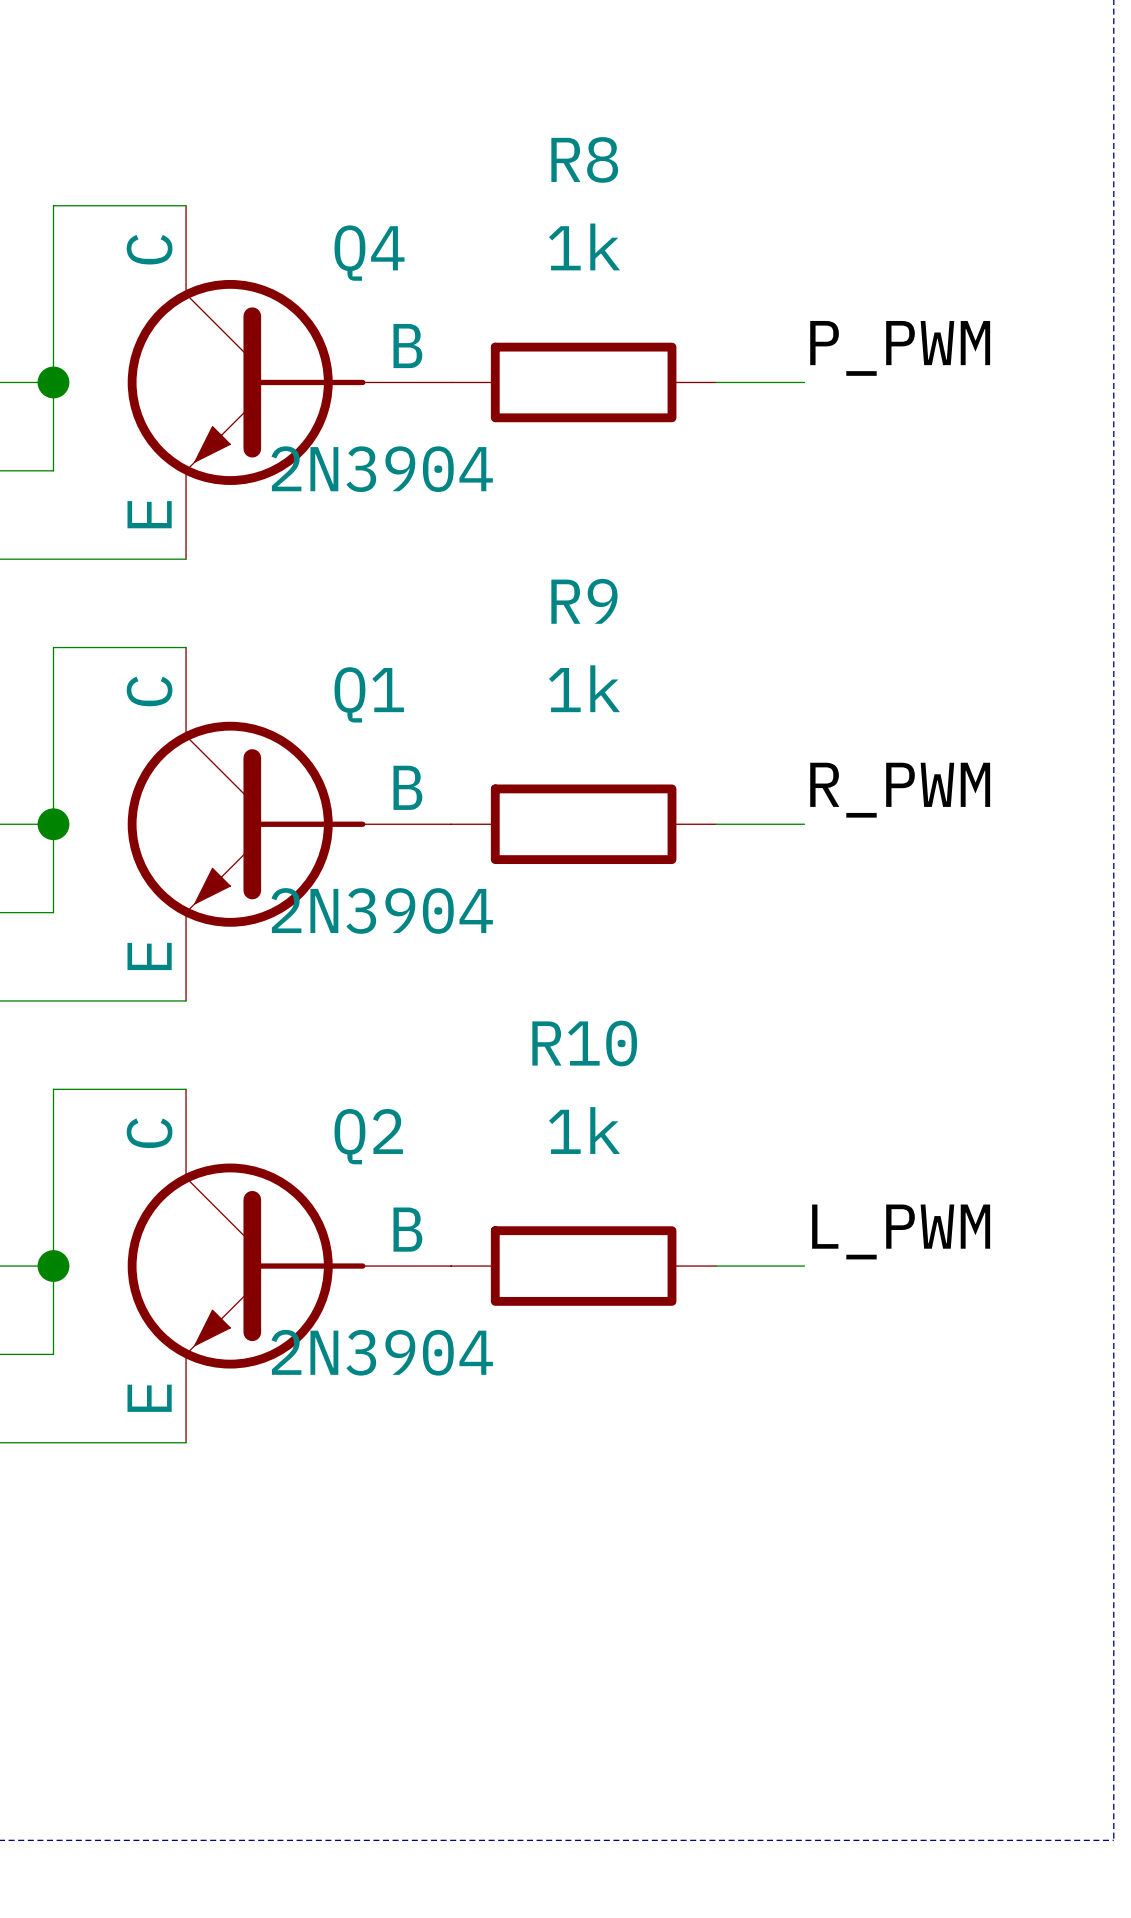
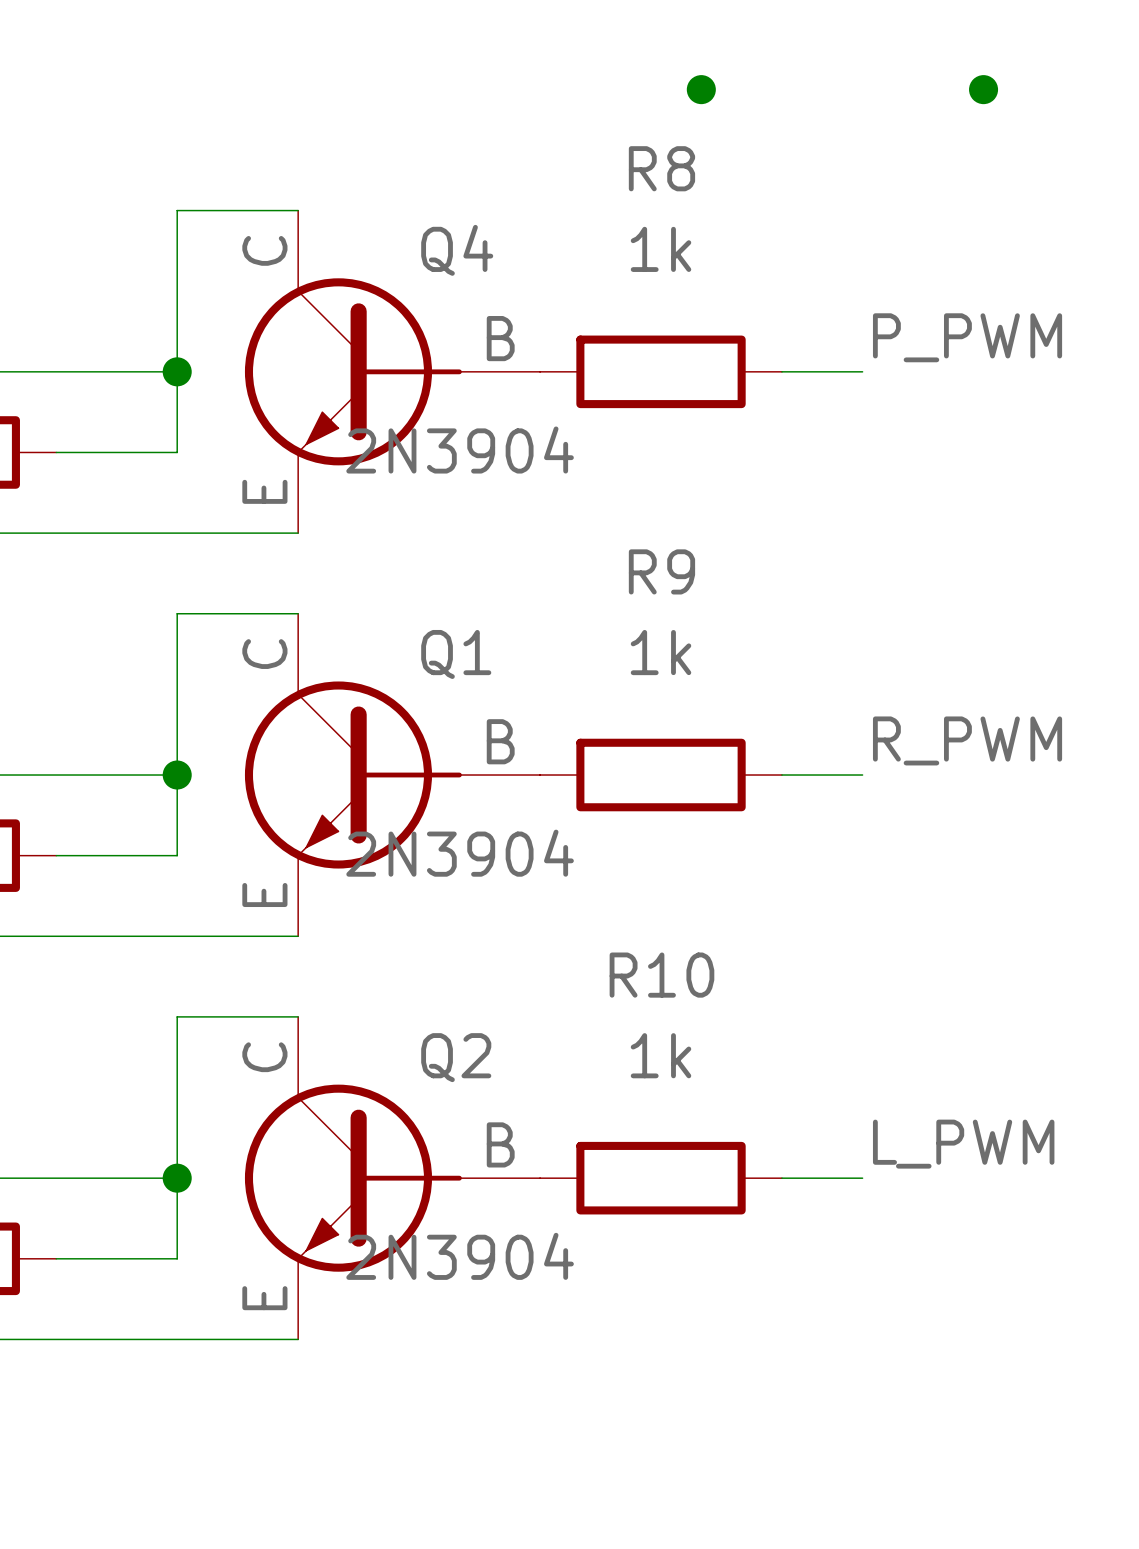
junction: none -> (701, 89)
junction: none -> (983, 89)

